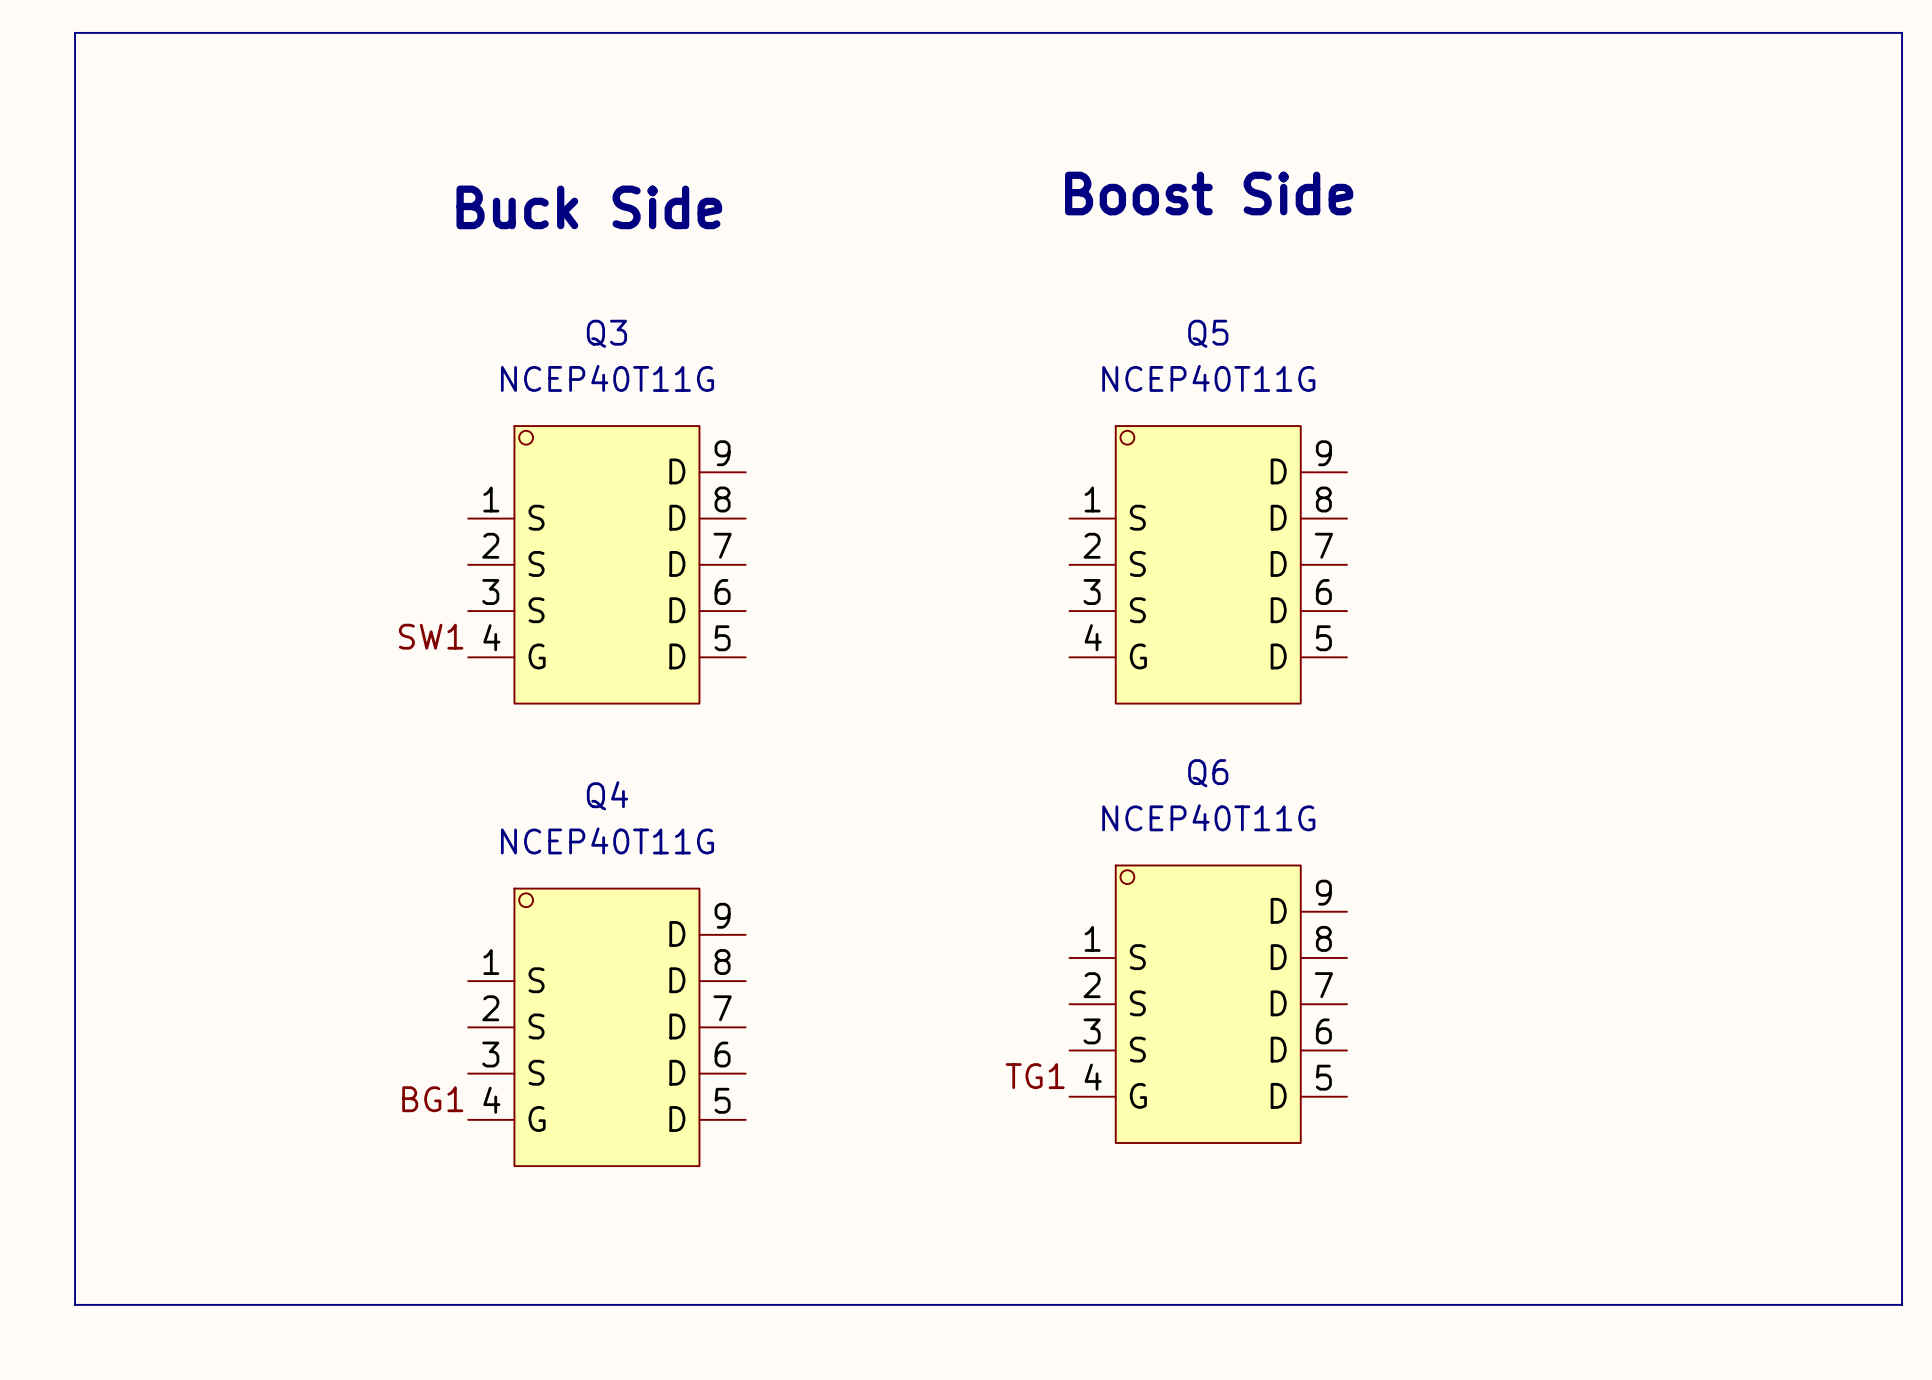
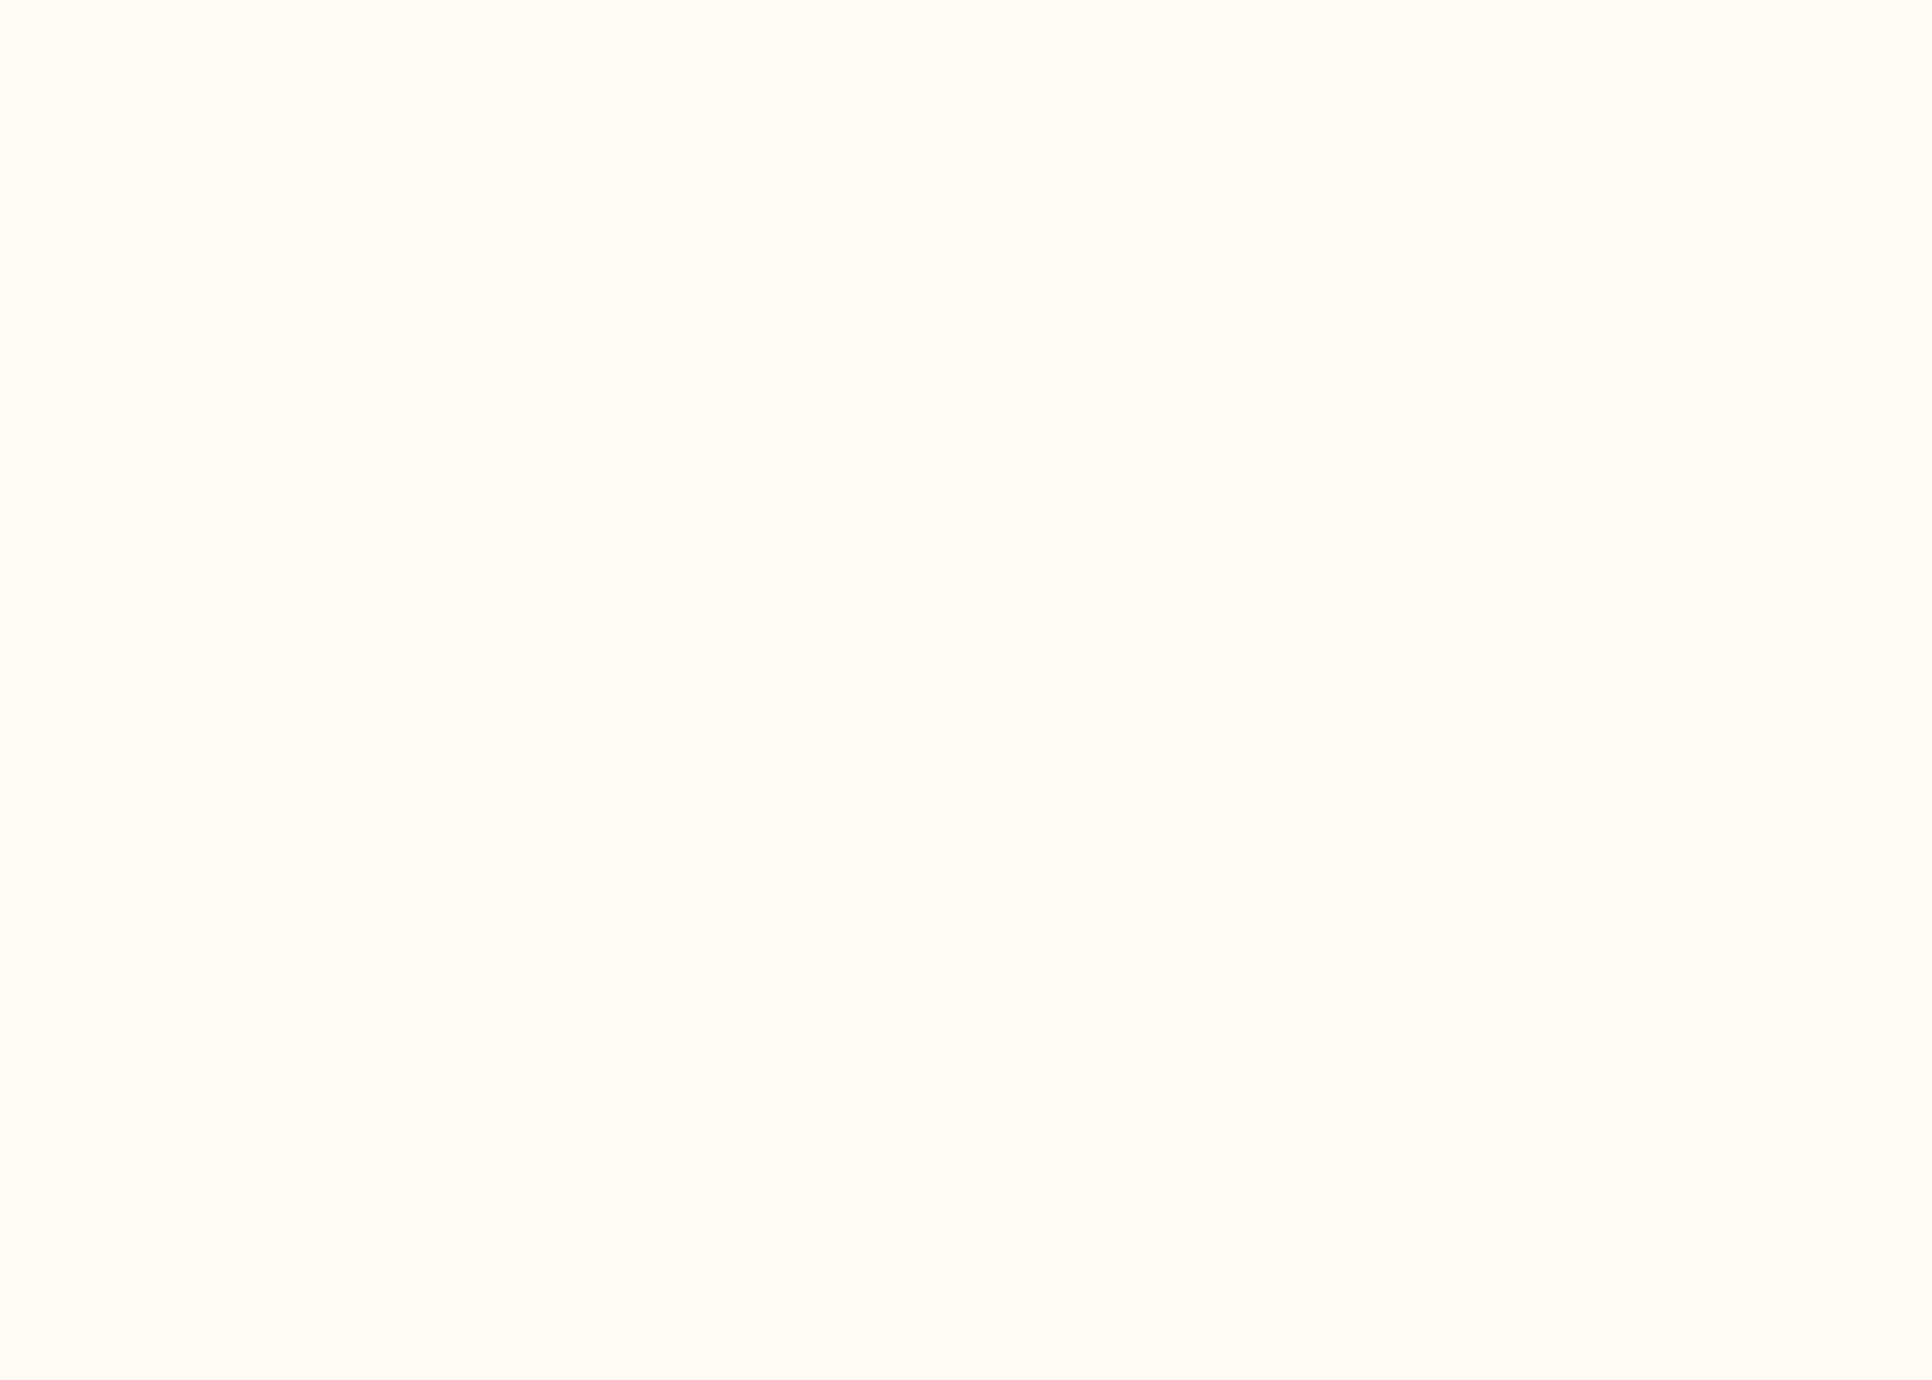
line: (75, 32) (1902, 32) (1902, 1304) (75, 1304) (75, 32) -> none
text: Boost Side (1209, 193) -> none
text: Buck Side (589, 207) -> none
Q3: NCEP40T11G (606, 564) -> none
Q5: NCEP40T11G (1208, 564) -> none
label: SW1 (431, 636) -> none
Q6: NCEP40T11G (1208, 1004) -> none
Q4: NCEP40T11G (606, 1027) -> none
label: TG1 (1035, 1076) -> none
label: BG1 (432, 1099) -> none

